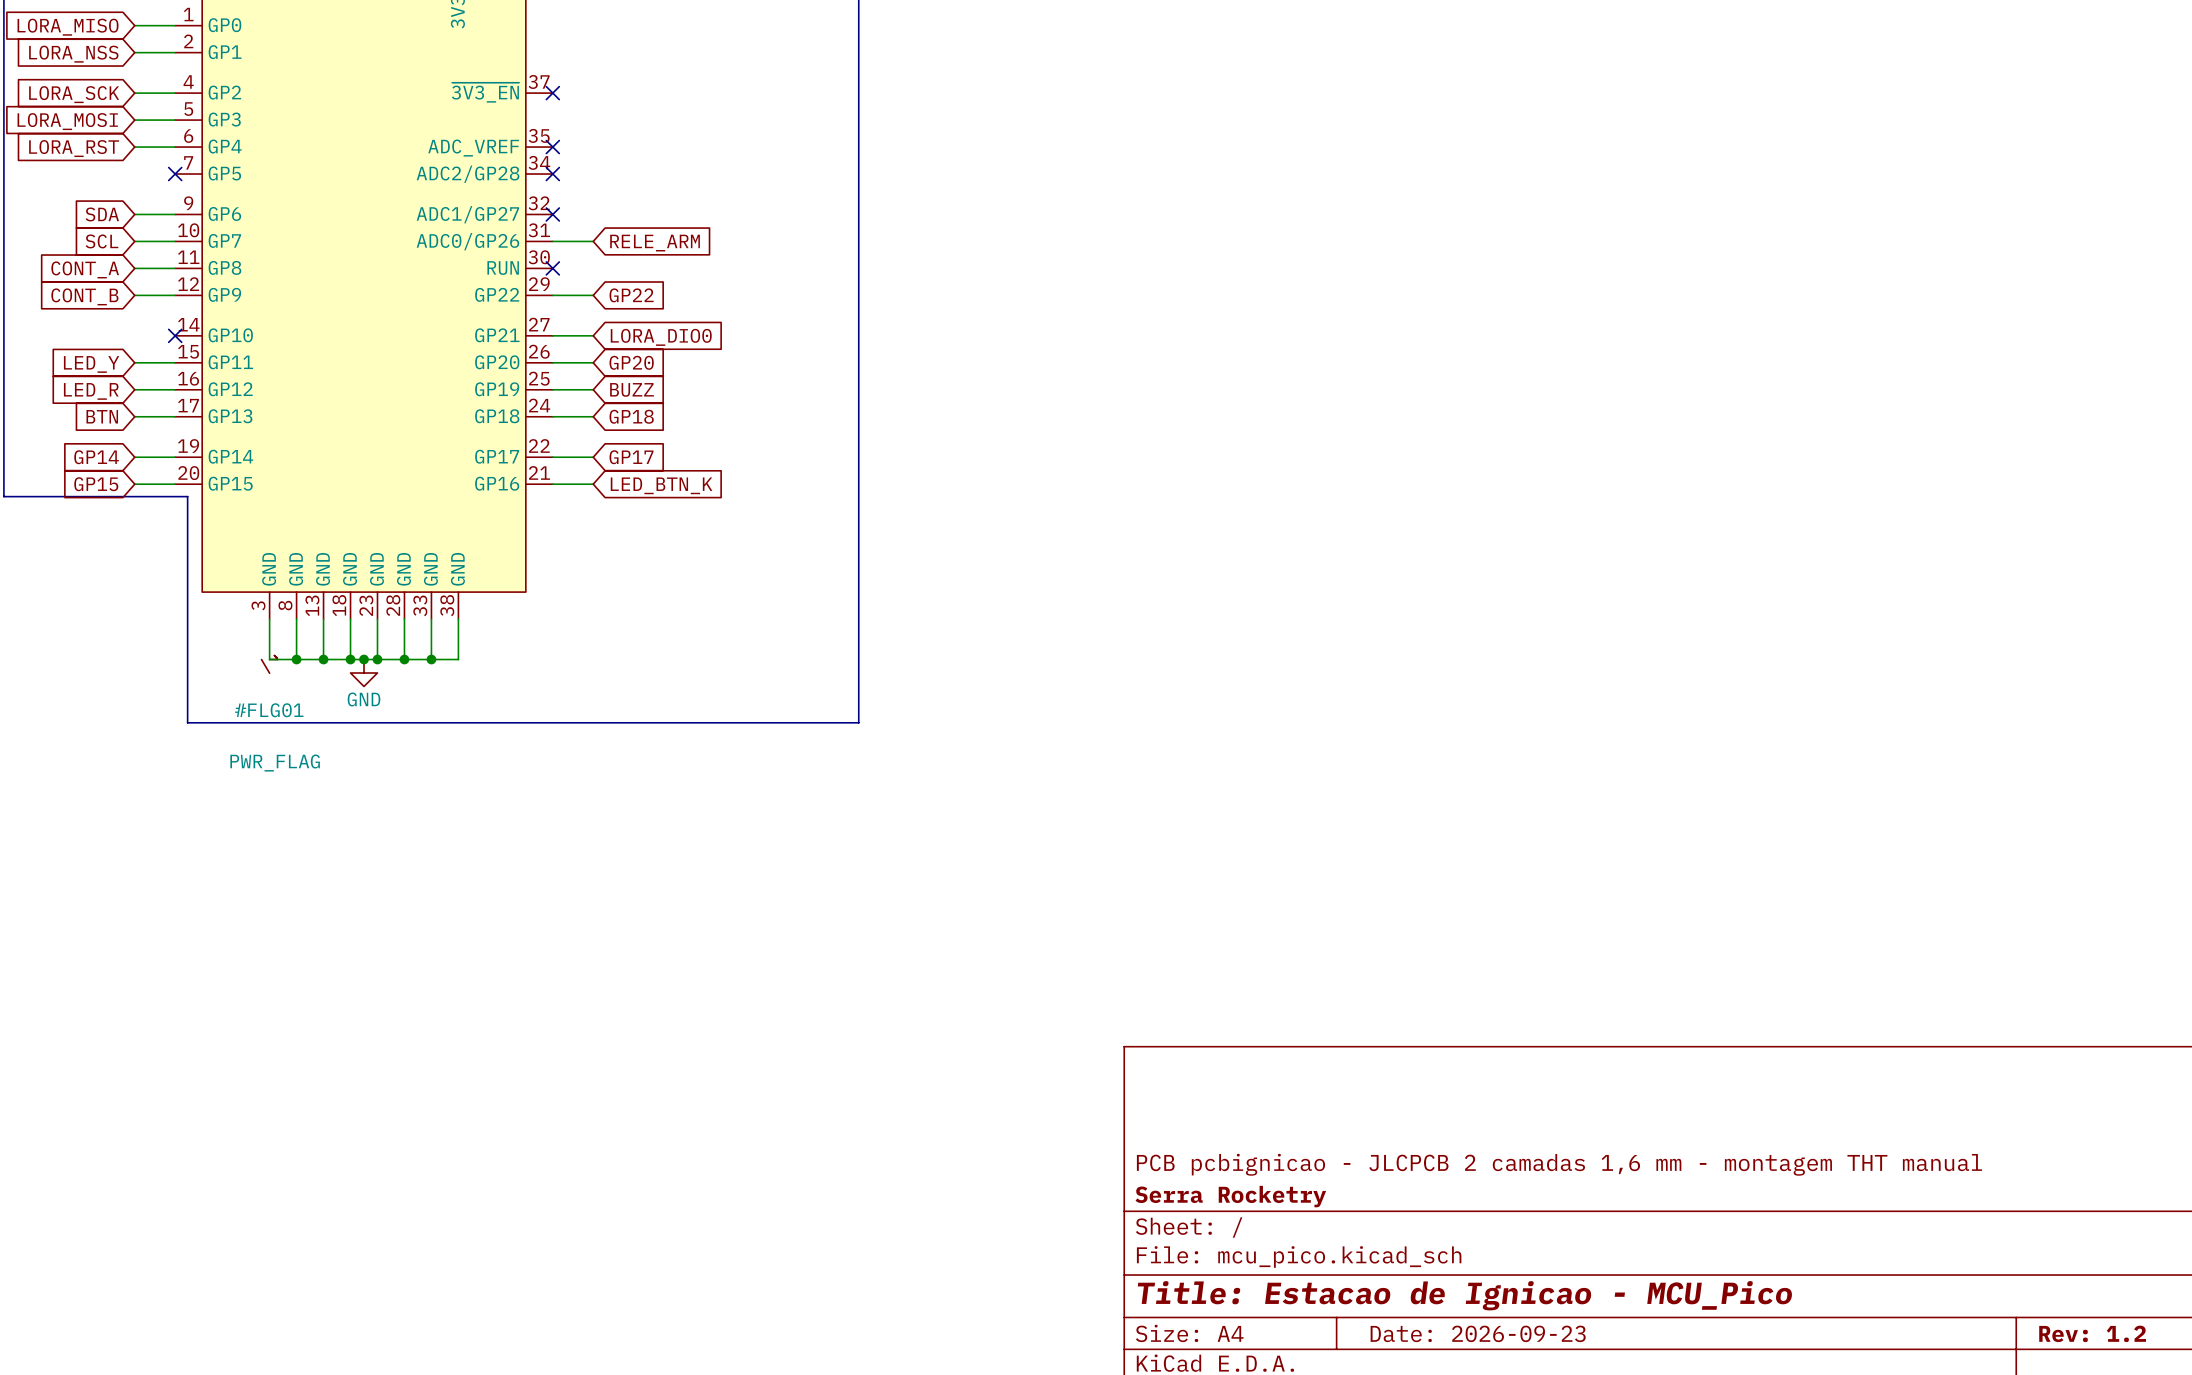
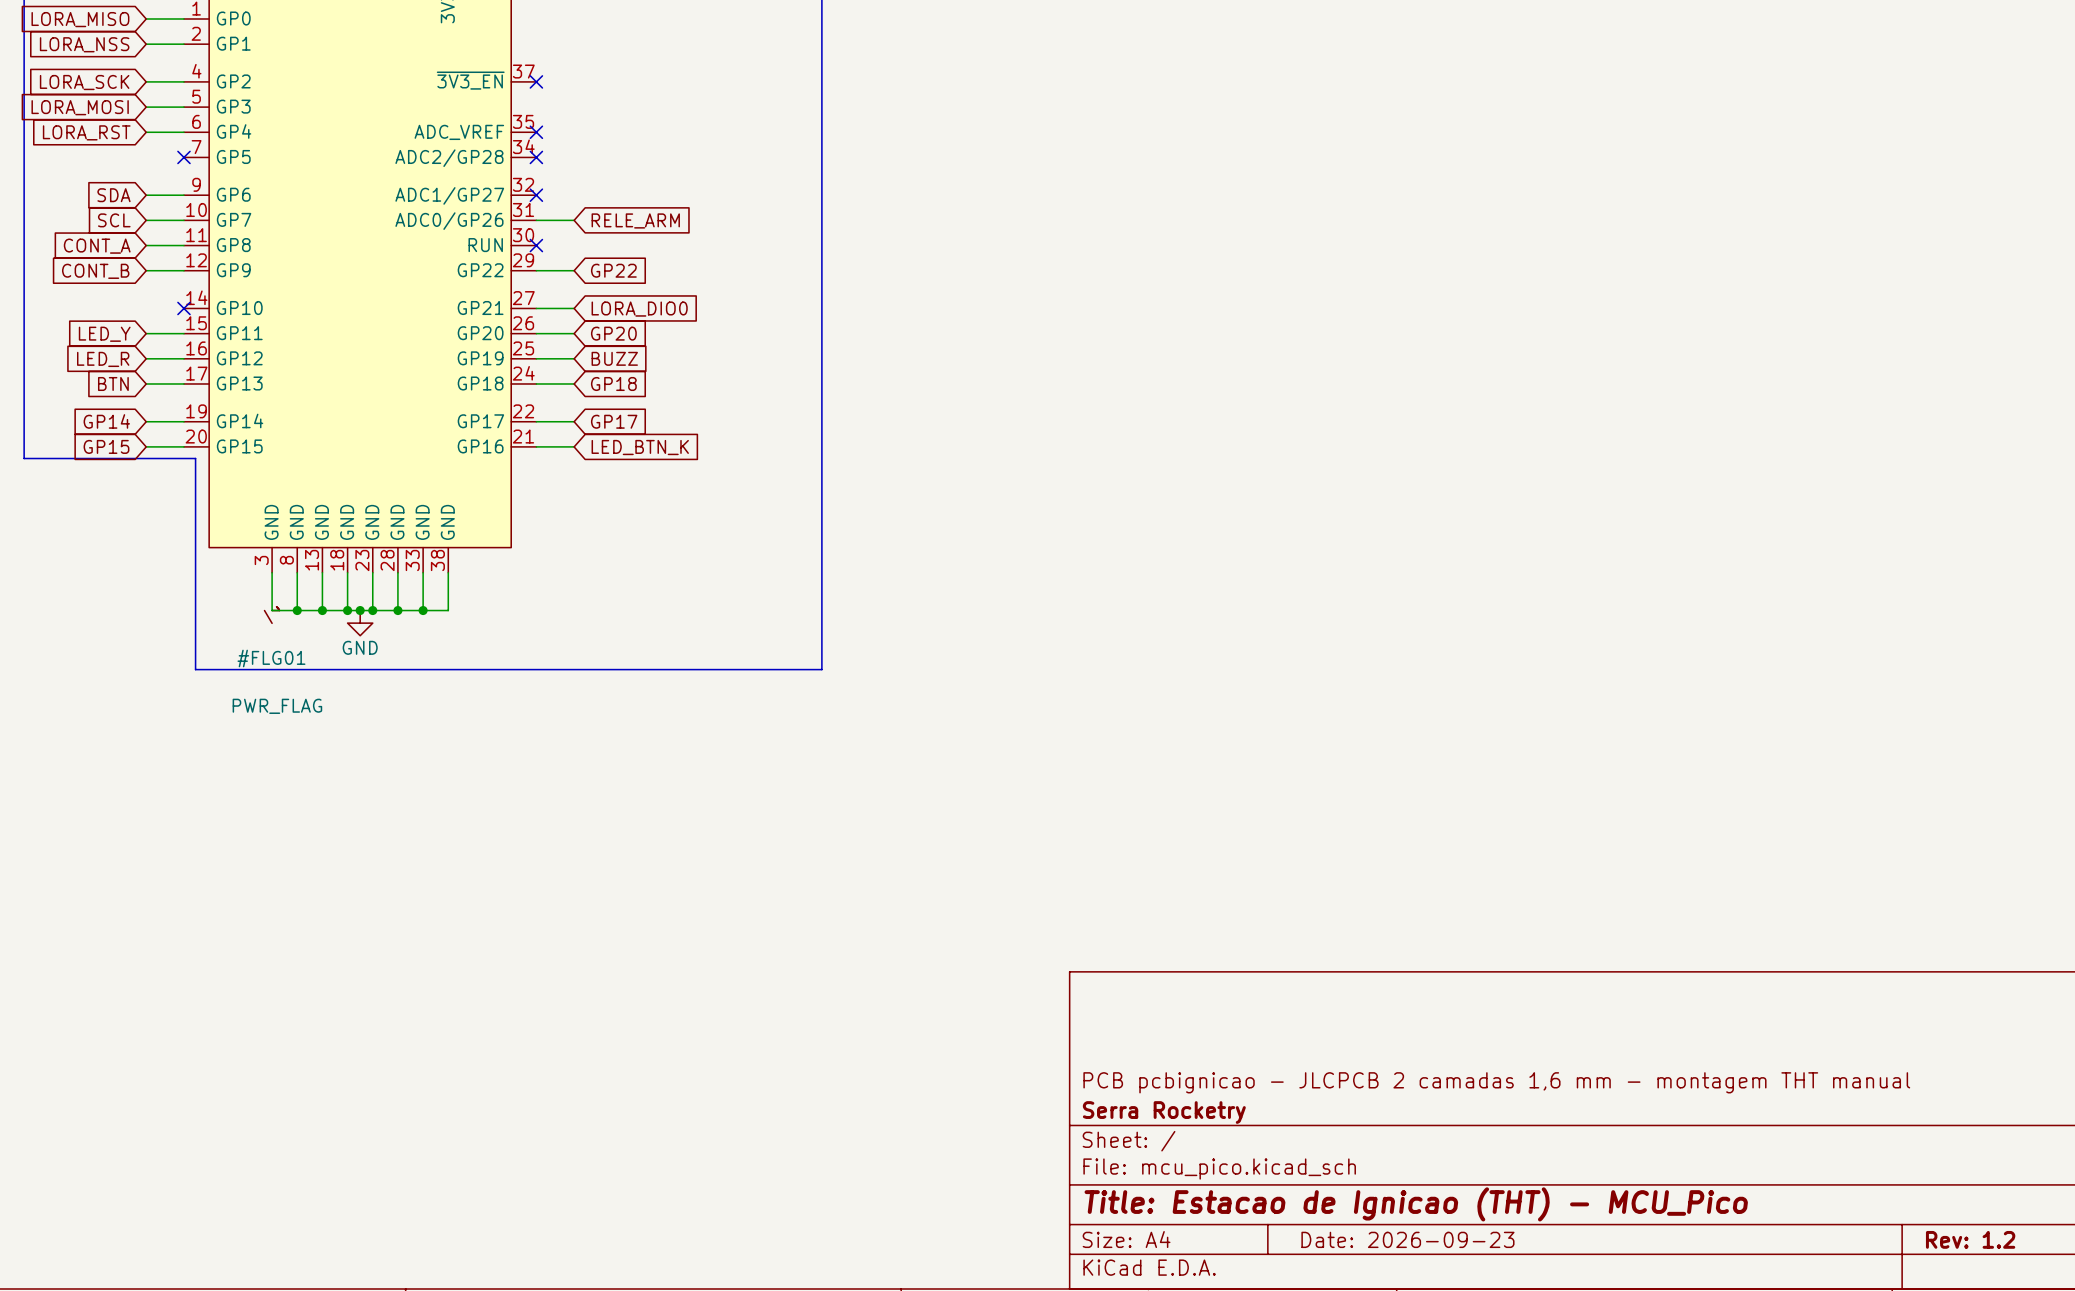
title block: Title: Estacao de Ignicao - MCU_Pico (1464, 1295) -> Title: Estacao de Ignicao (THT) - MCU_Pico (1416, 1204)

